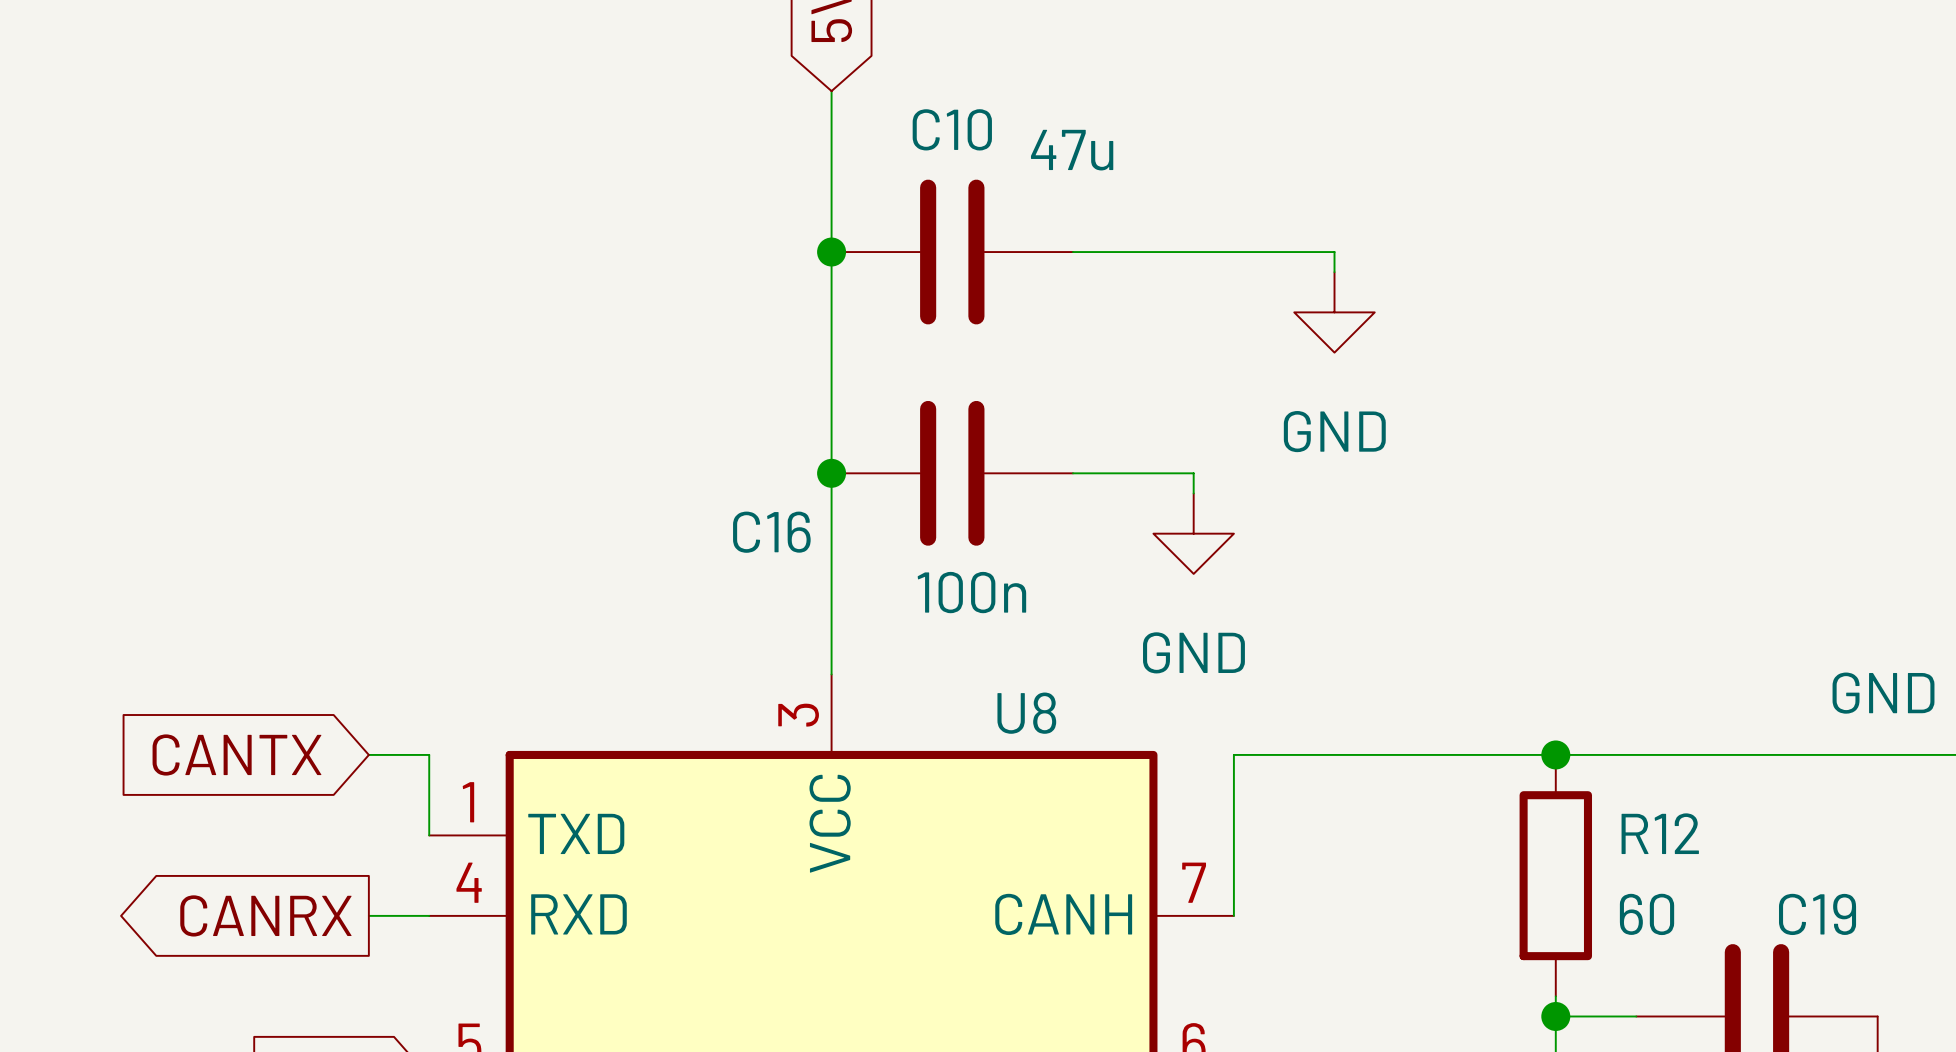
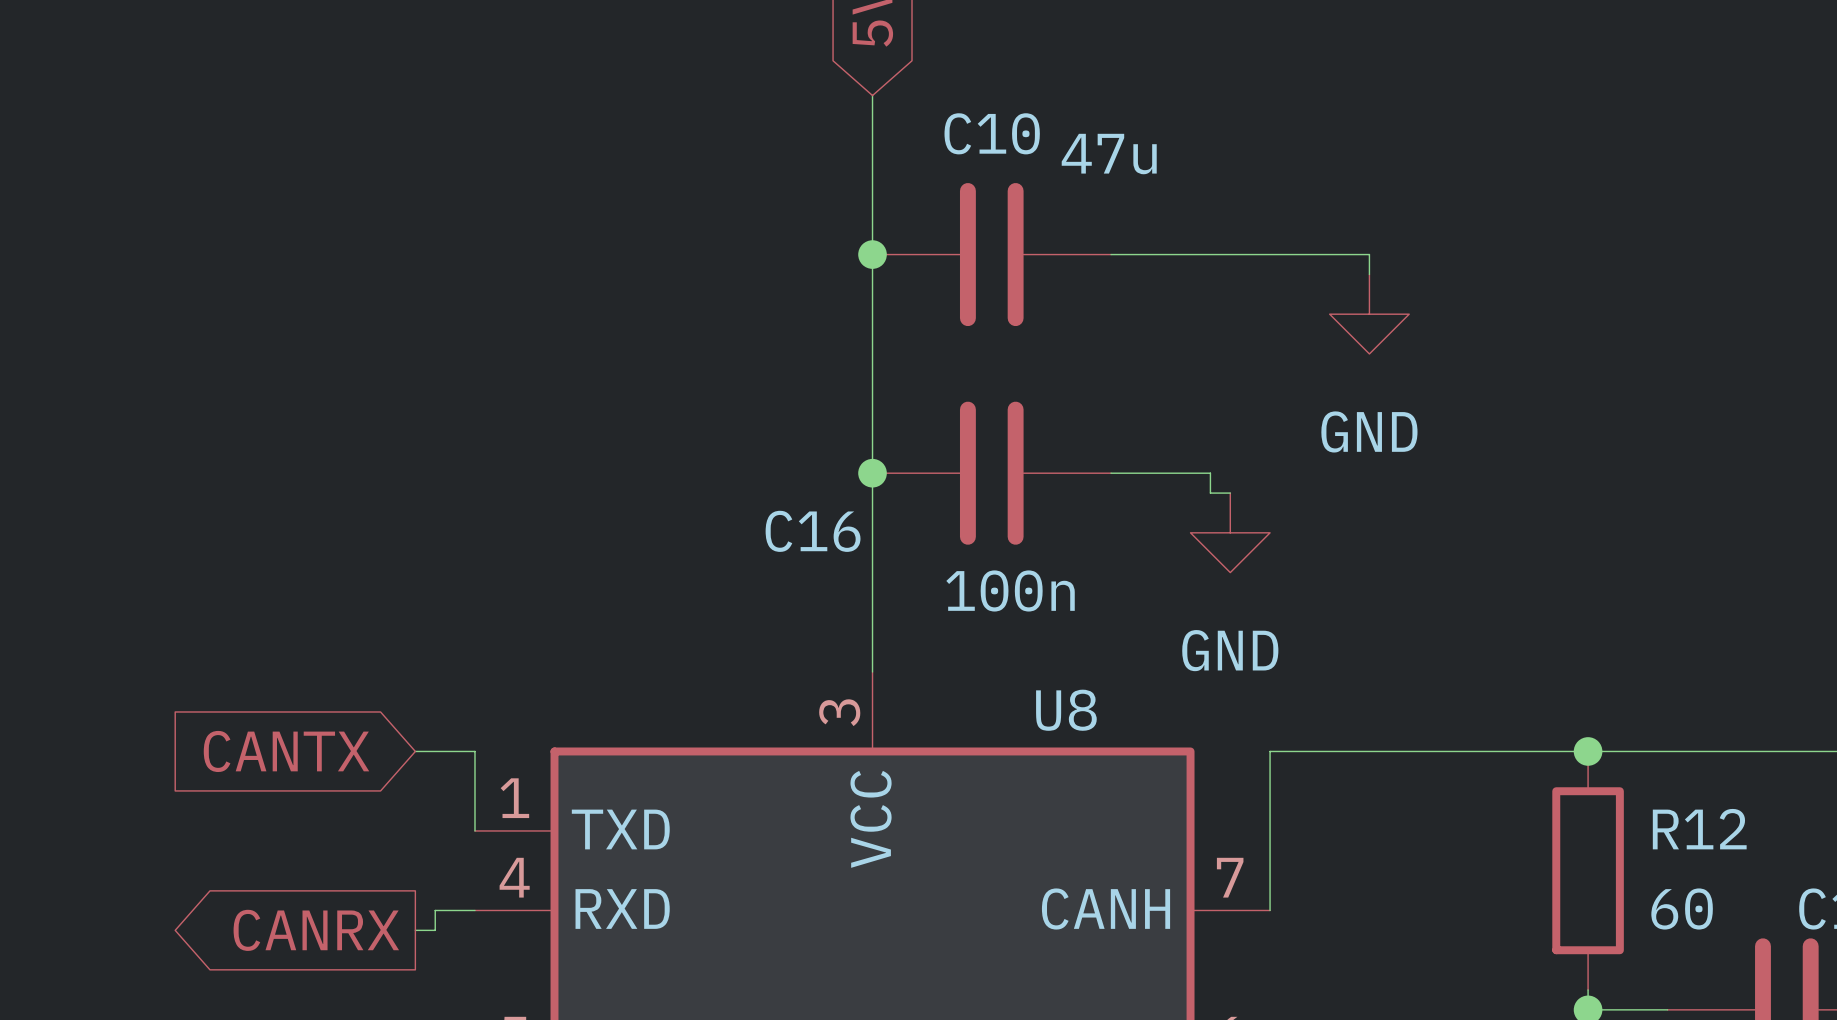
wire: (1173, 473) (1193, 473) (1193, 493) -> (1210, 473) (1210, 493) (1230, 493)
global label position: CANRX (265, 915) -> CANRX (316, 930)
wire: (368, 915) (388, 915) -> (415, 930) (435, 930) (435, 910)

